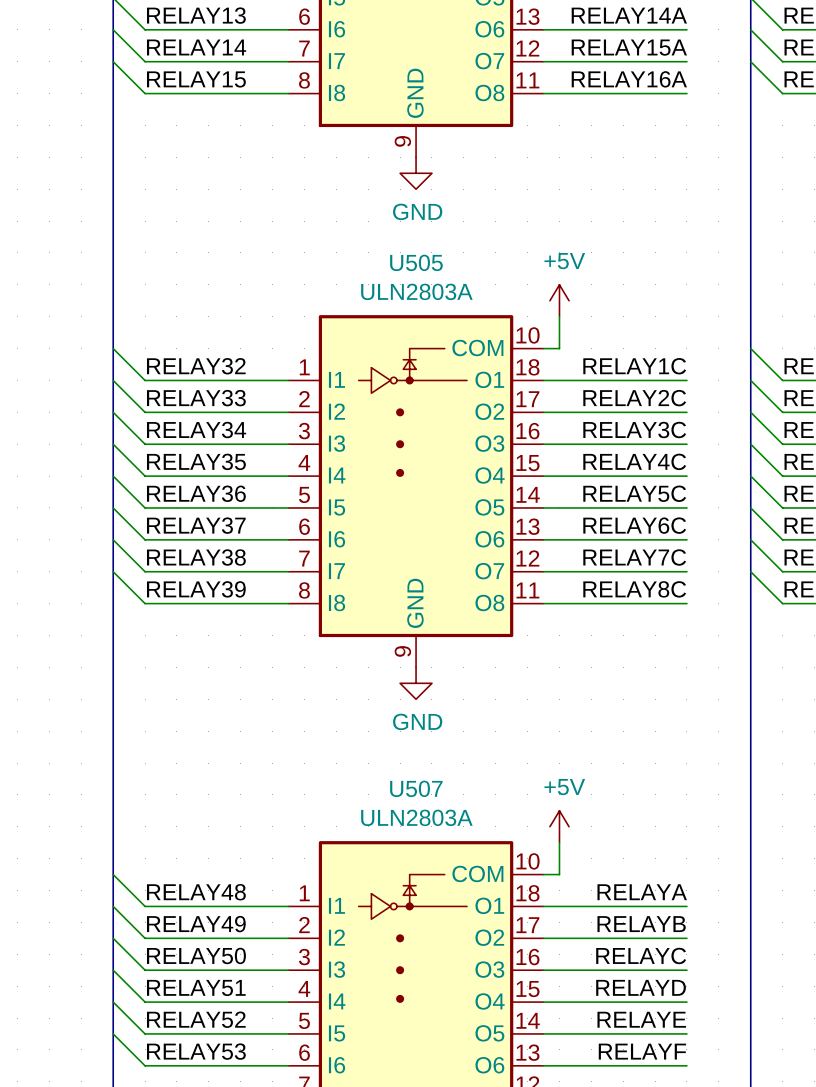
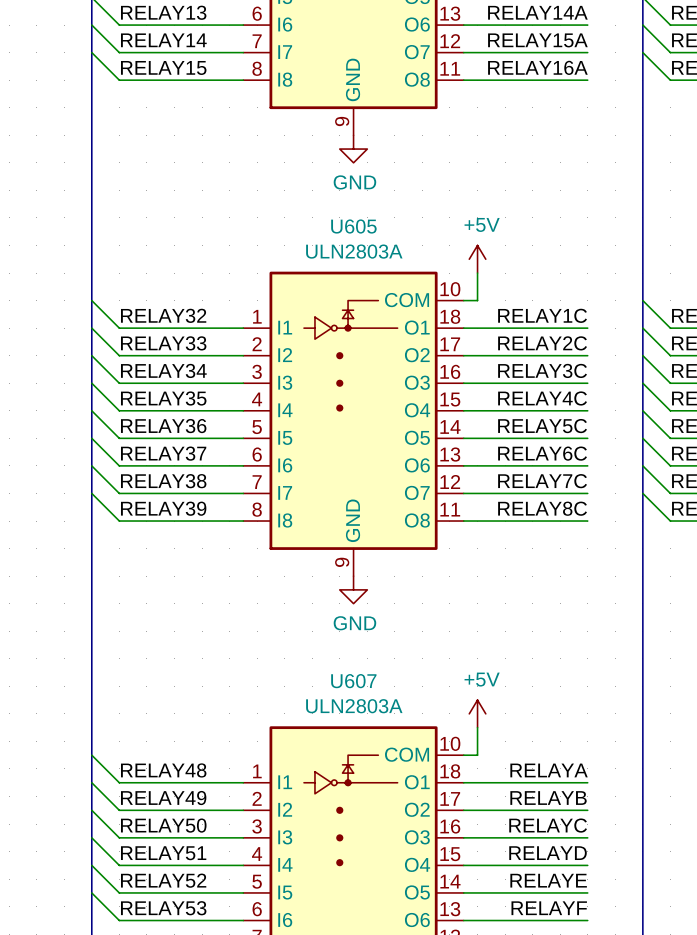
U505 name: U505 (416, 262) -> U605 (353, 226)
U507 name: U507 (416, 788) -> U607 (353, 681)

